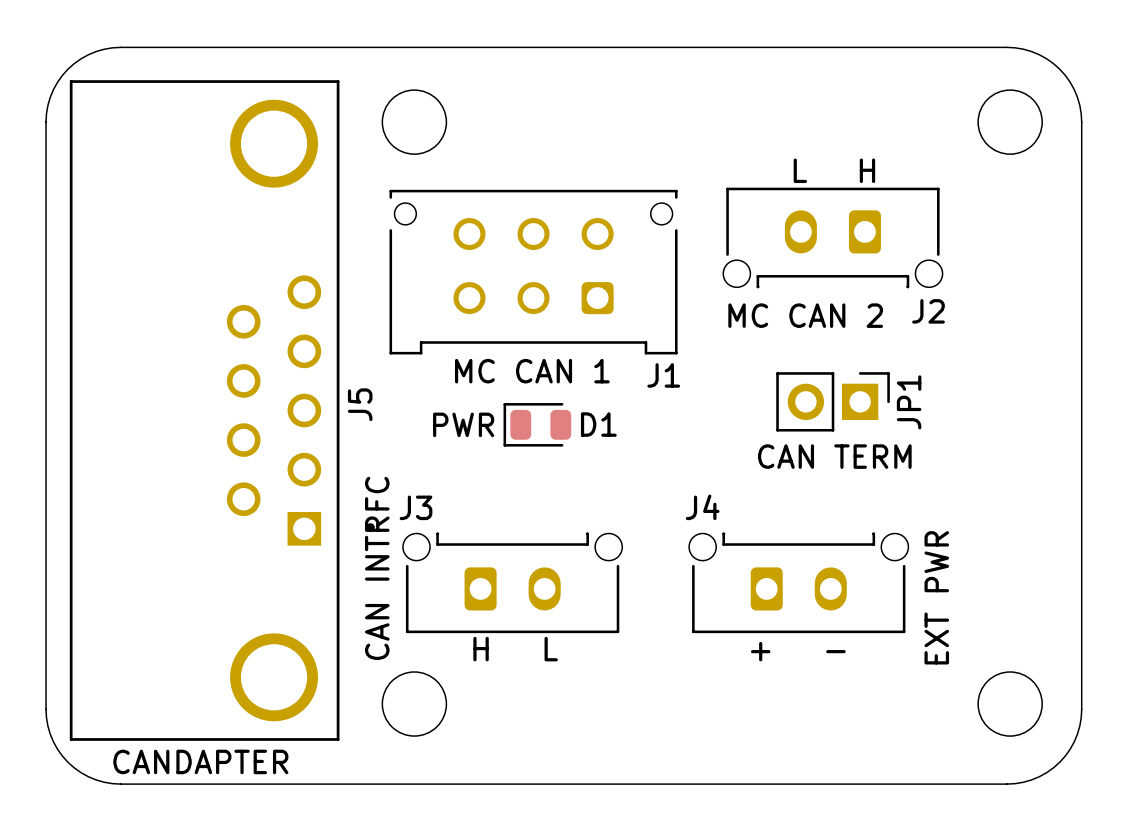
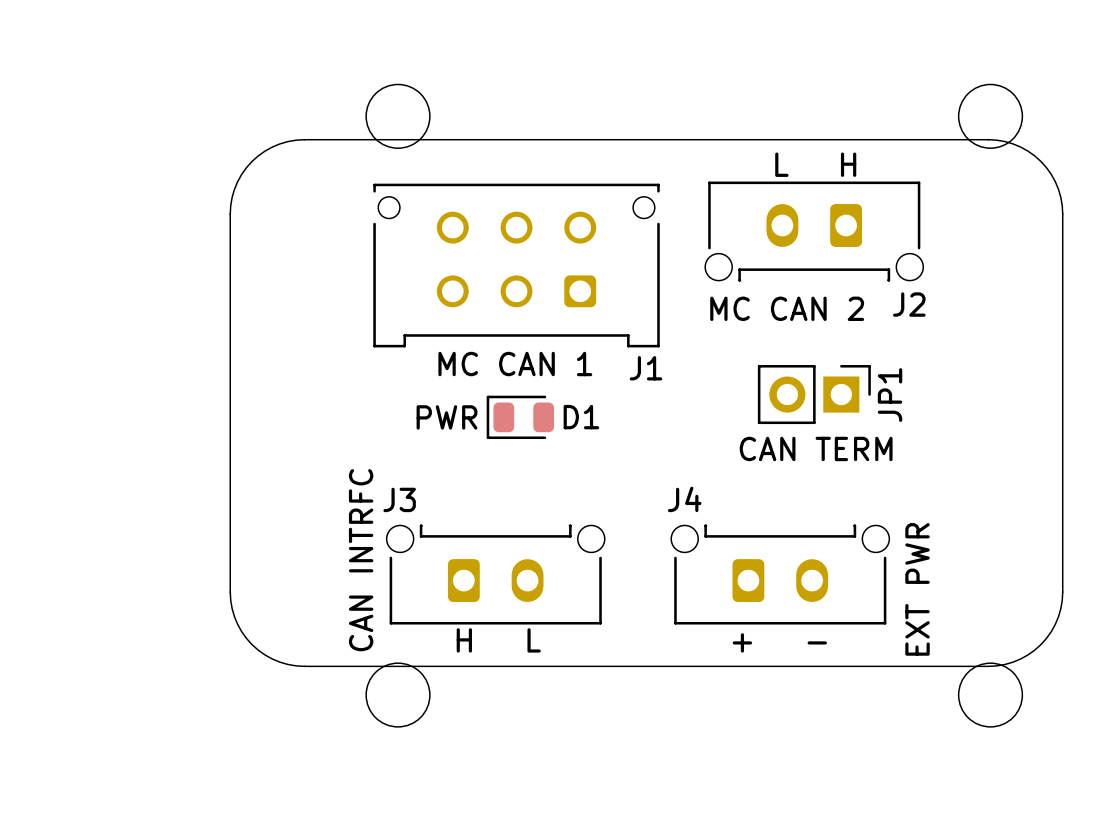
board edge: (120, 47) (1006, 47) (1031, 51) (1053, 63) (1065, 75) (1074, 89) (1079, 105) (1081, 122) (1081, 709) (1077, 734) (1065, 755) (1053, 767) (1039, 776) (1023, 782) (1006, 784) (120, 784) (96, 779) (74, 767) (62, 755) (53, 741) (47, 725) (46, 709) (46, 113) (53, 89) (62, 75) (74, 63) (96, 51) (120, 47) -> (304, 139) (288, 141) (272, 147) (252, 161) (237, 181) (230, 205) (230, 600) (234, 616) (241, 631) (252, 644) (265, 654) (288, 664) (304, 666) (988, 666) (1012, 662) (1027, 654) (1040, 644) (1051, 631) (1058, 616) (1062, 592) (1062, 214) (1060, 197) (1055, 181) (1046, 167) (1027, 151) (1004, 141) (988, 139) (304, 139)
J5: CANDAPTER (222, 410) -> none

